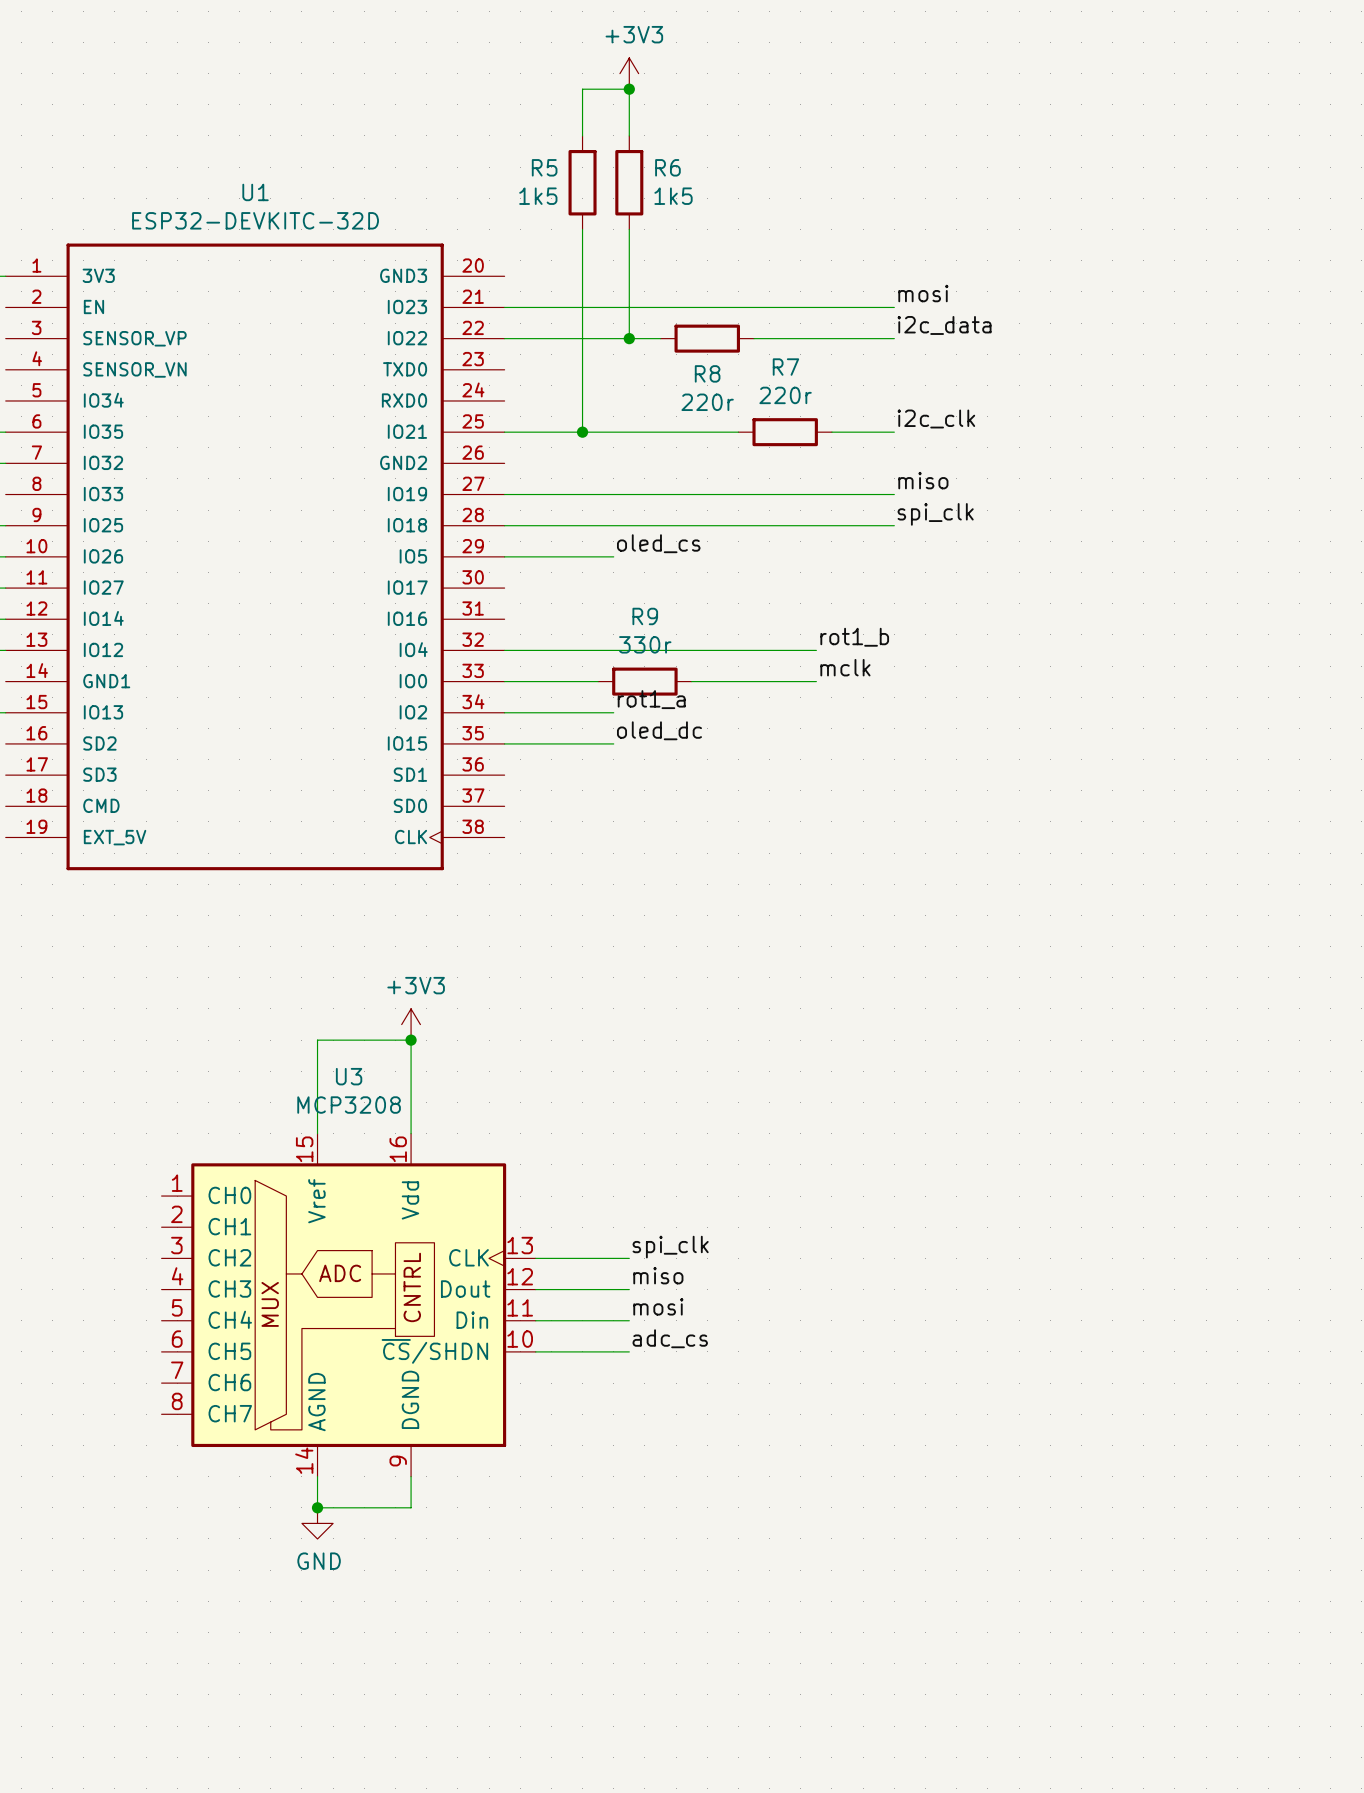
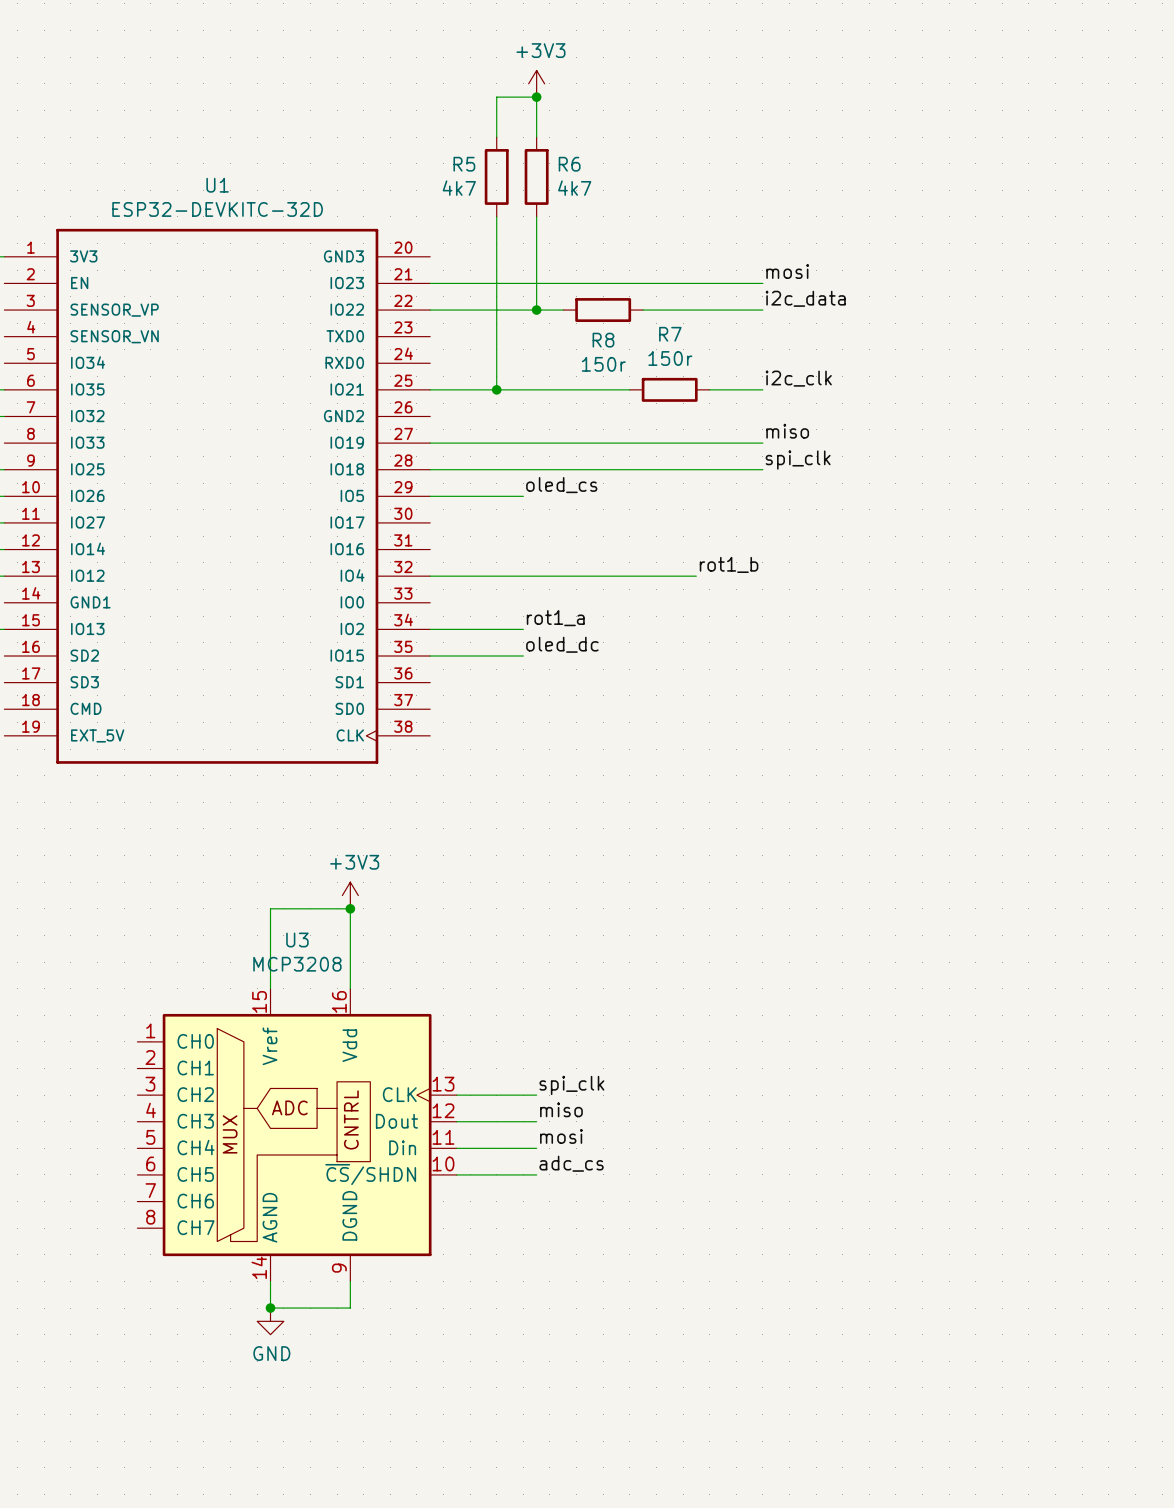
R5 value: 1k5 (538, 196) -> 4k7 (459, 188)
R6 value: 1k5 (673, 196) -> 4k7 (574, 188)
R7 value: 220r (785, 395) -> 150r (670, 358)
R8 value: 220r (707, 402) -> 150r (603, 364)
label: mclk (845, 667) -> none
wire: (504, 681) (598, 681) -> none
R9: 330r (644, 681) -> none
wire: (691, 681) (816, 681) -> none

